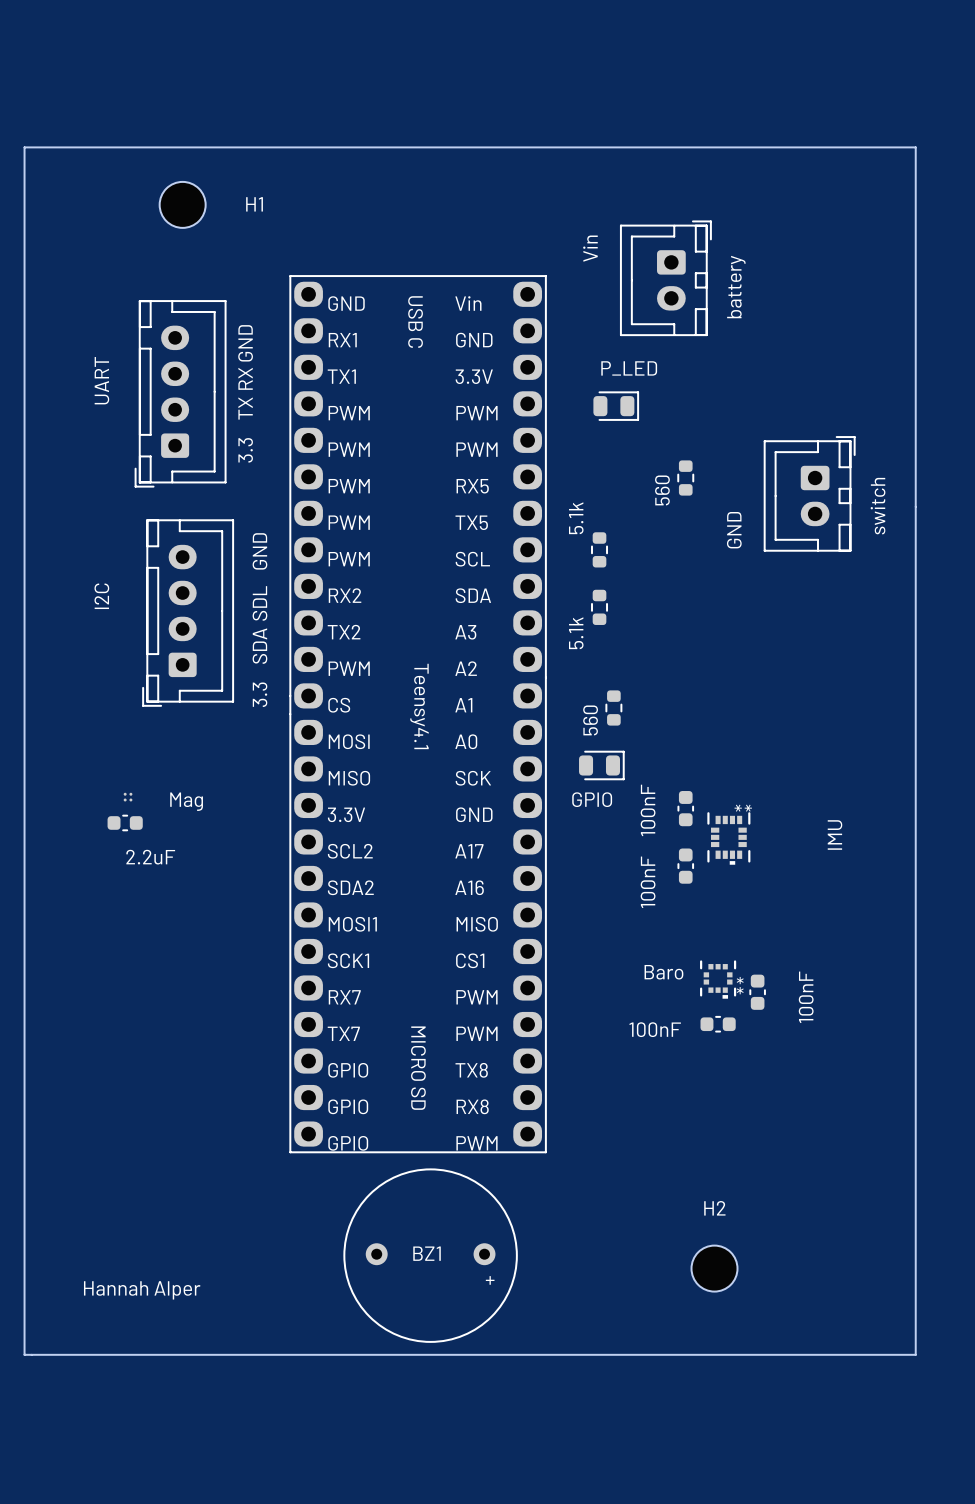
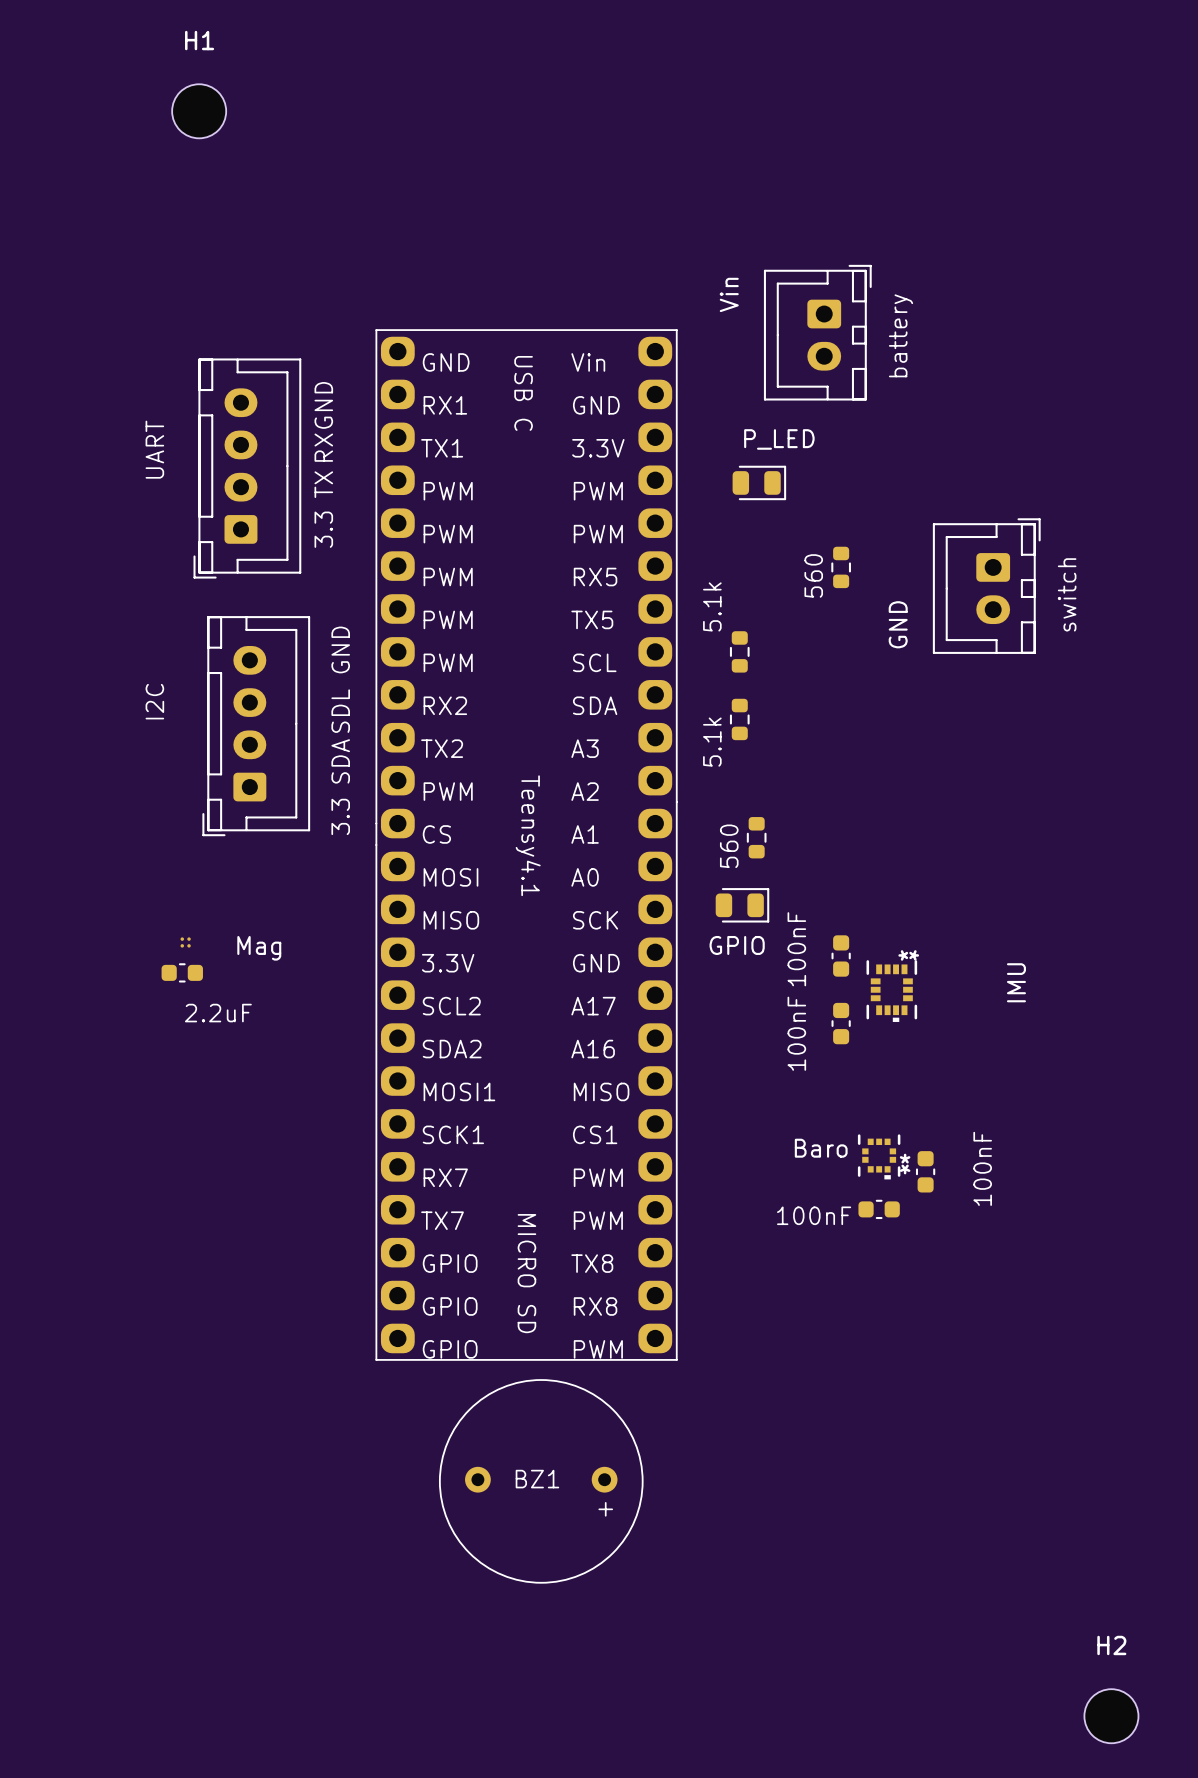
board edge: (24, 147) (24, 1354) (915, 1354) (915, 147) (24, 147) -> none
H1 position: (182, 204) -> (199, 111)
H1 name position: H1 (254, 204) -> H1 (199, 40)
H2 position: (714, 1268) -> (1111, 1716)
text: Hannah Alper (142, 1290) -> none

